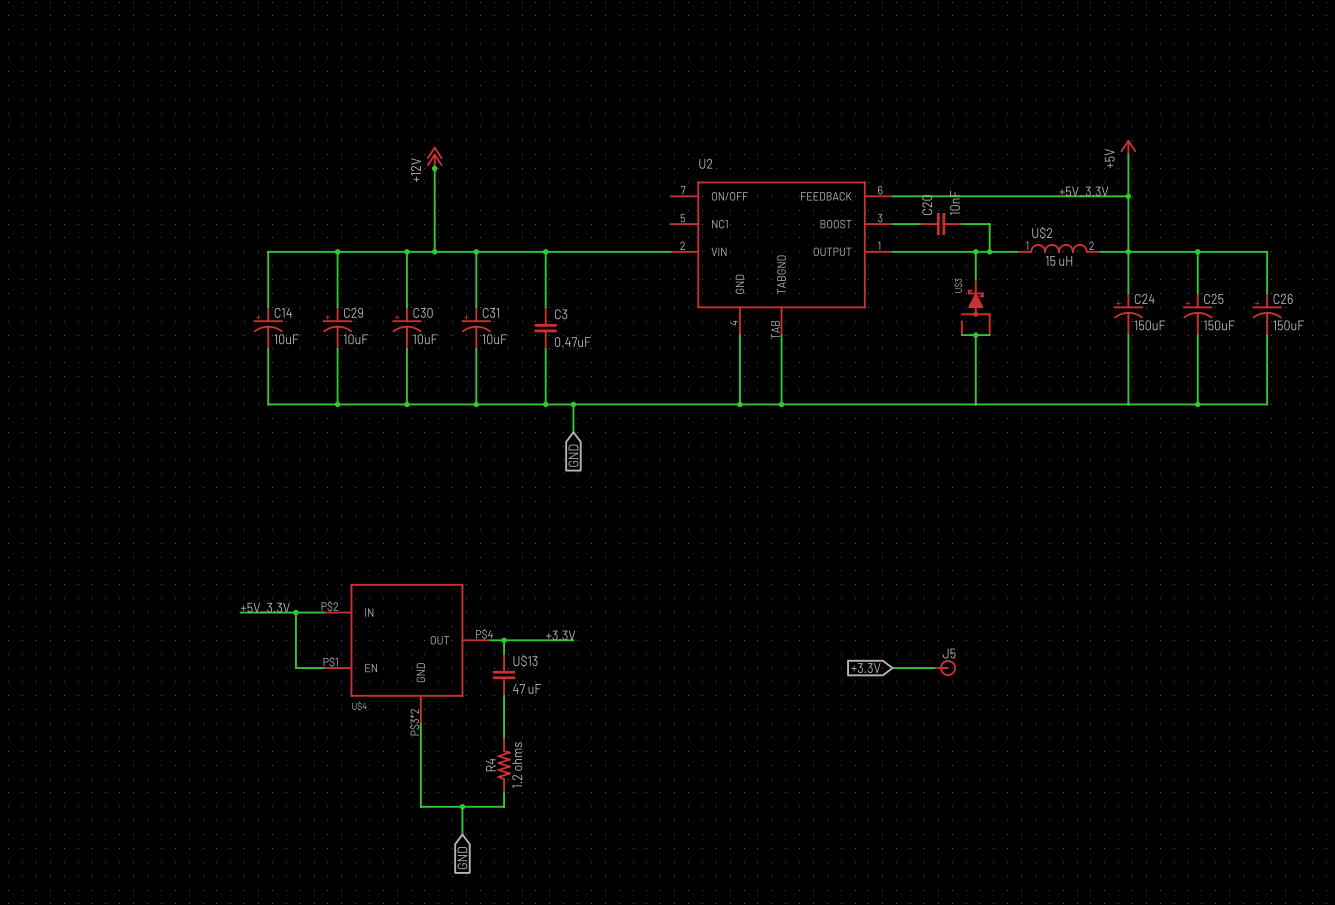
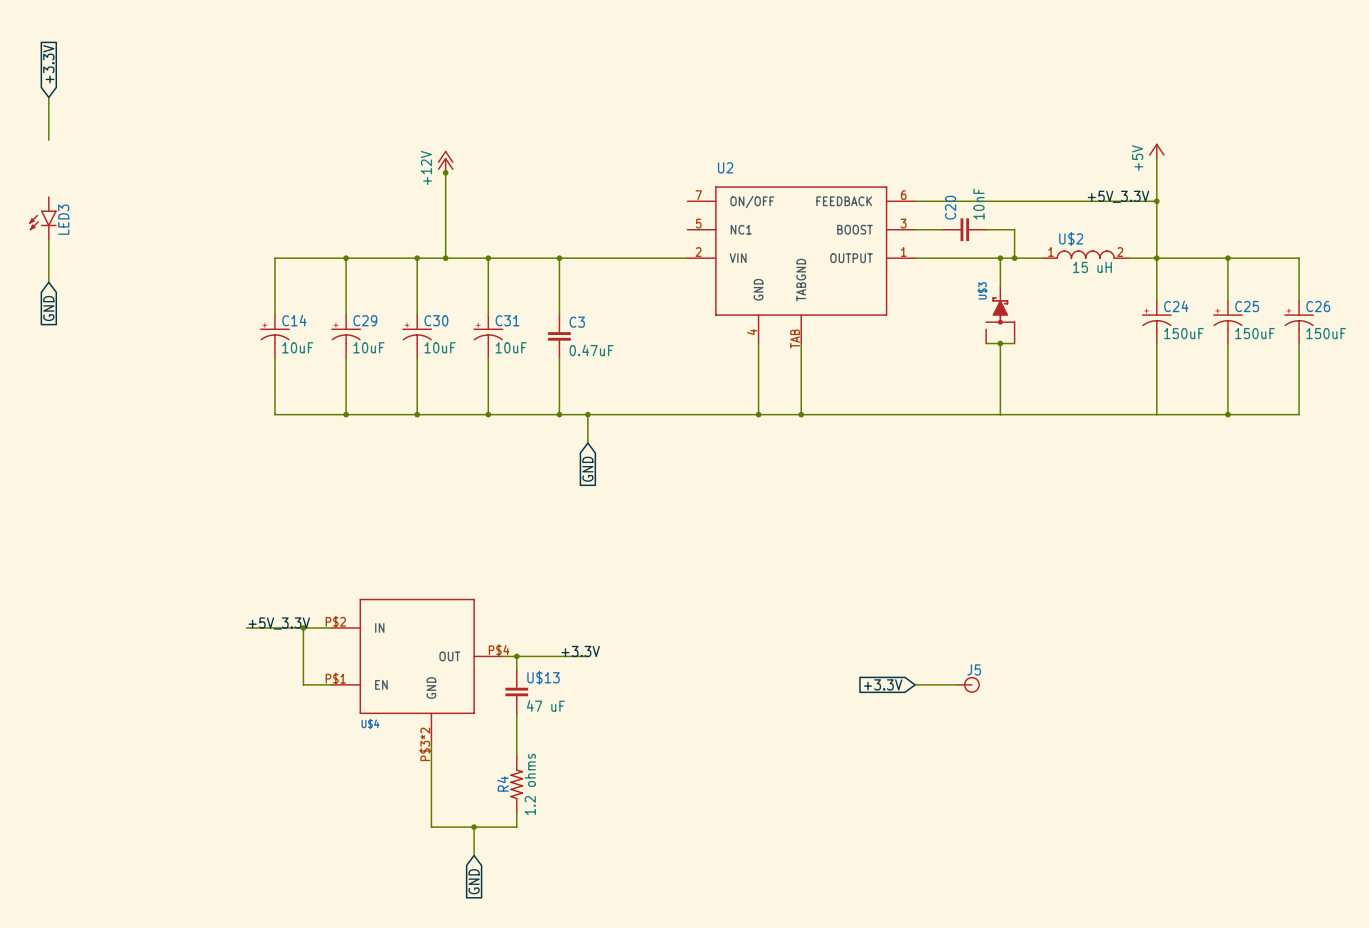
global label: none -> +3.3V (48, 64)
wire: none -> (48, 97) (48, 140)
LED3: none -> (42, 218)
wire: none -> (48, 239) (48, 282)
global label: none -> GND (48, 308)

